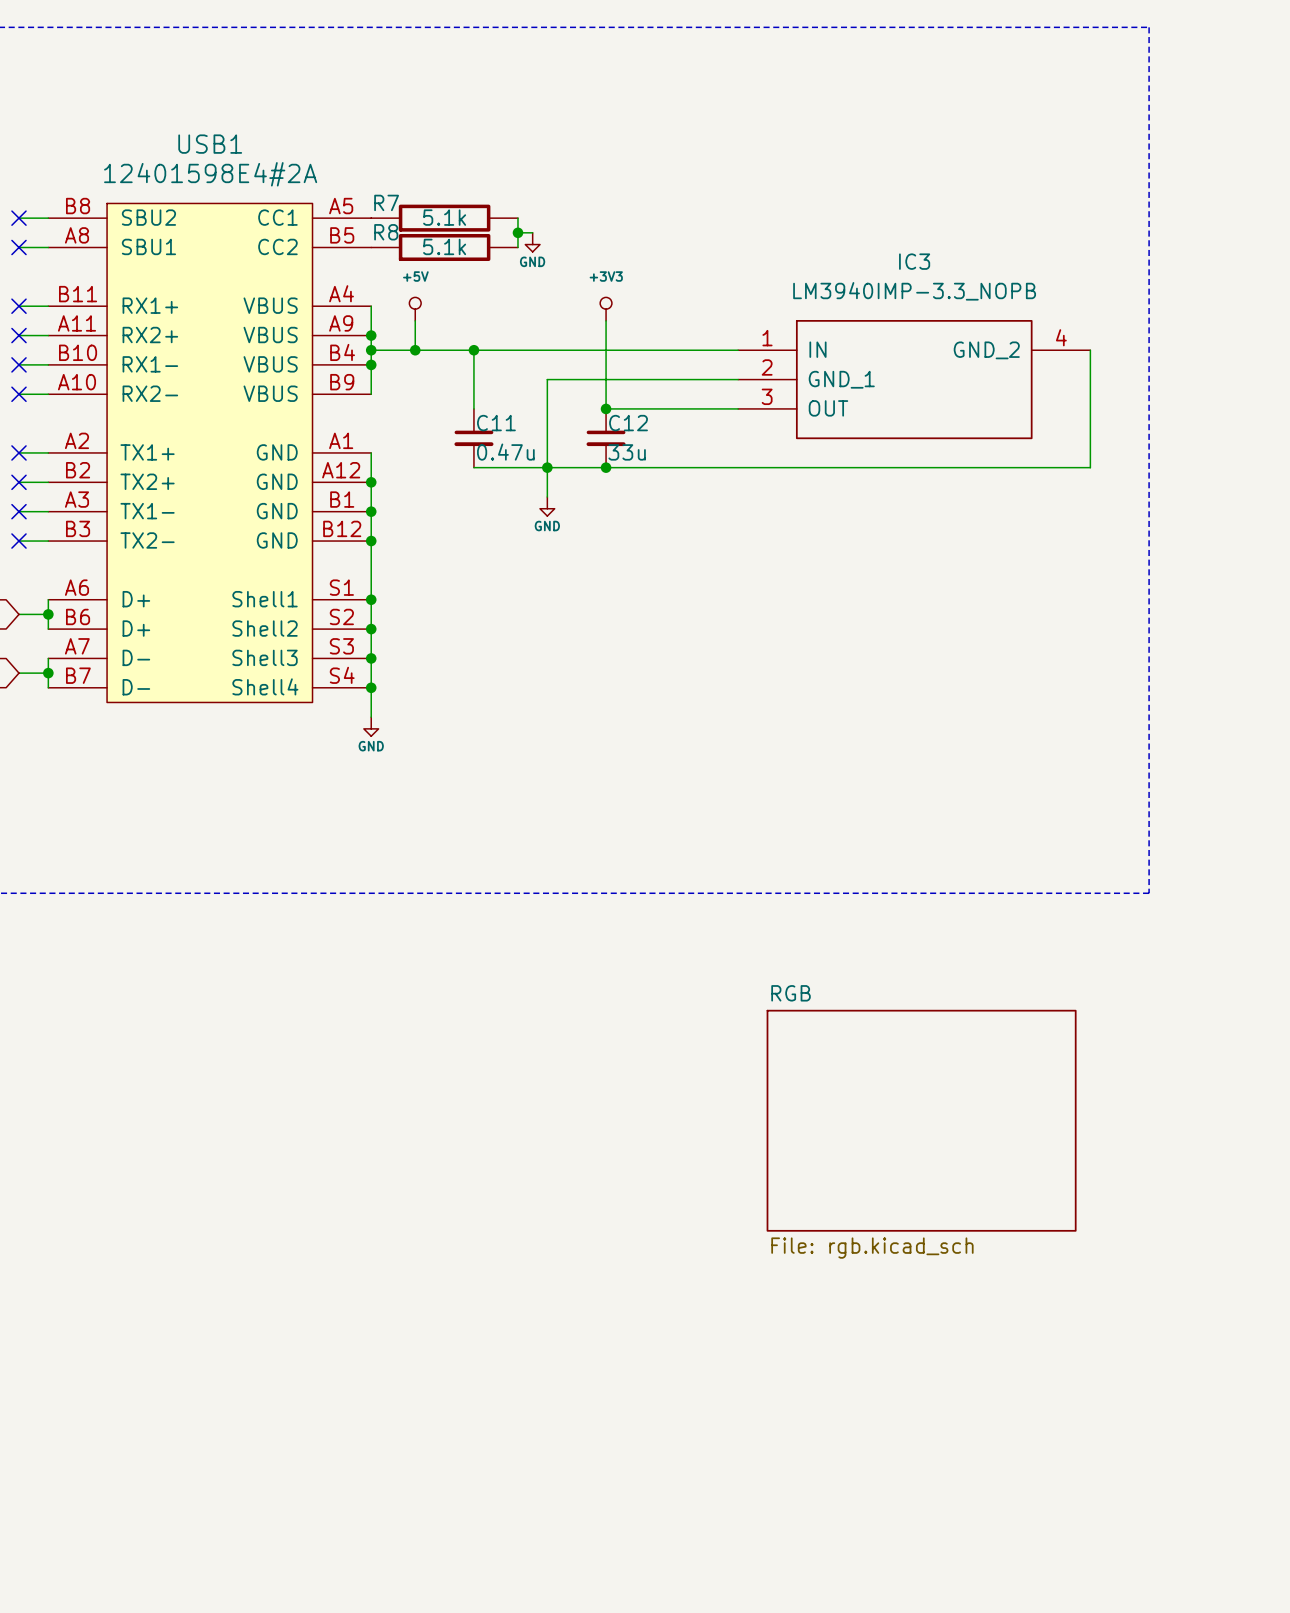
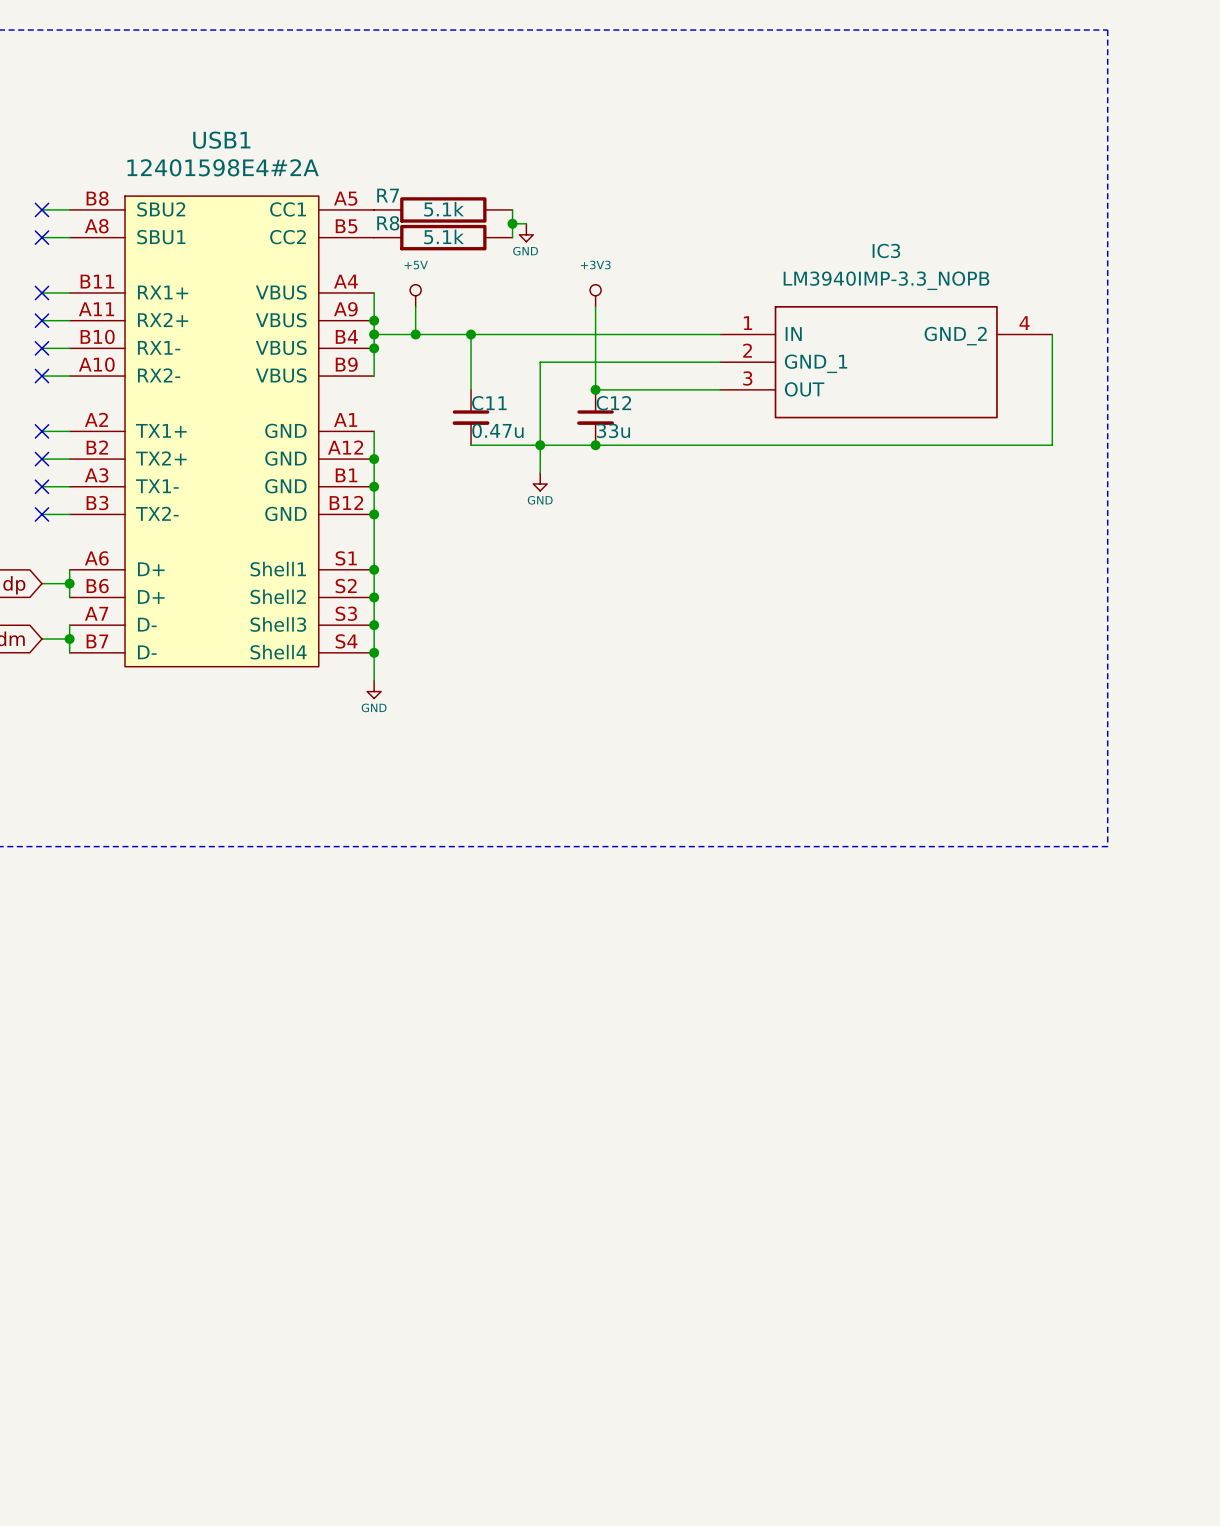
sheet RGB: File: rgb.kicad_sch (921, 1120) -> none

